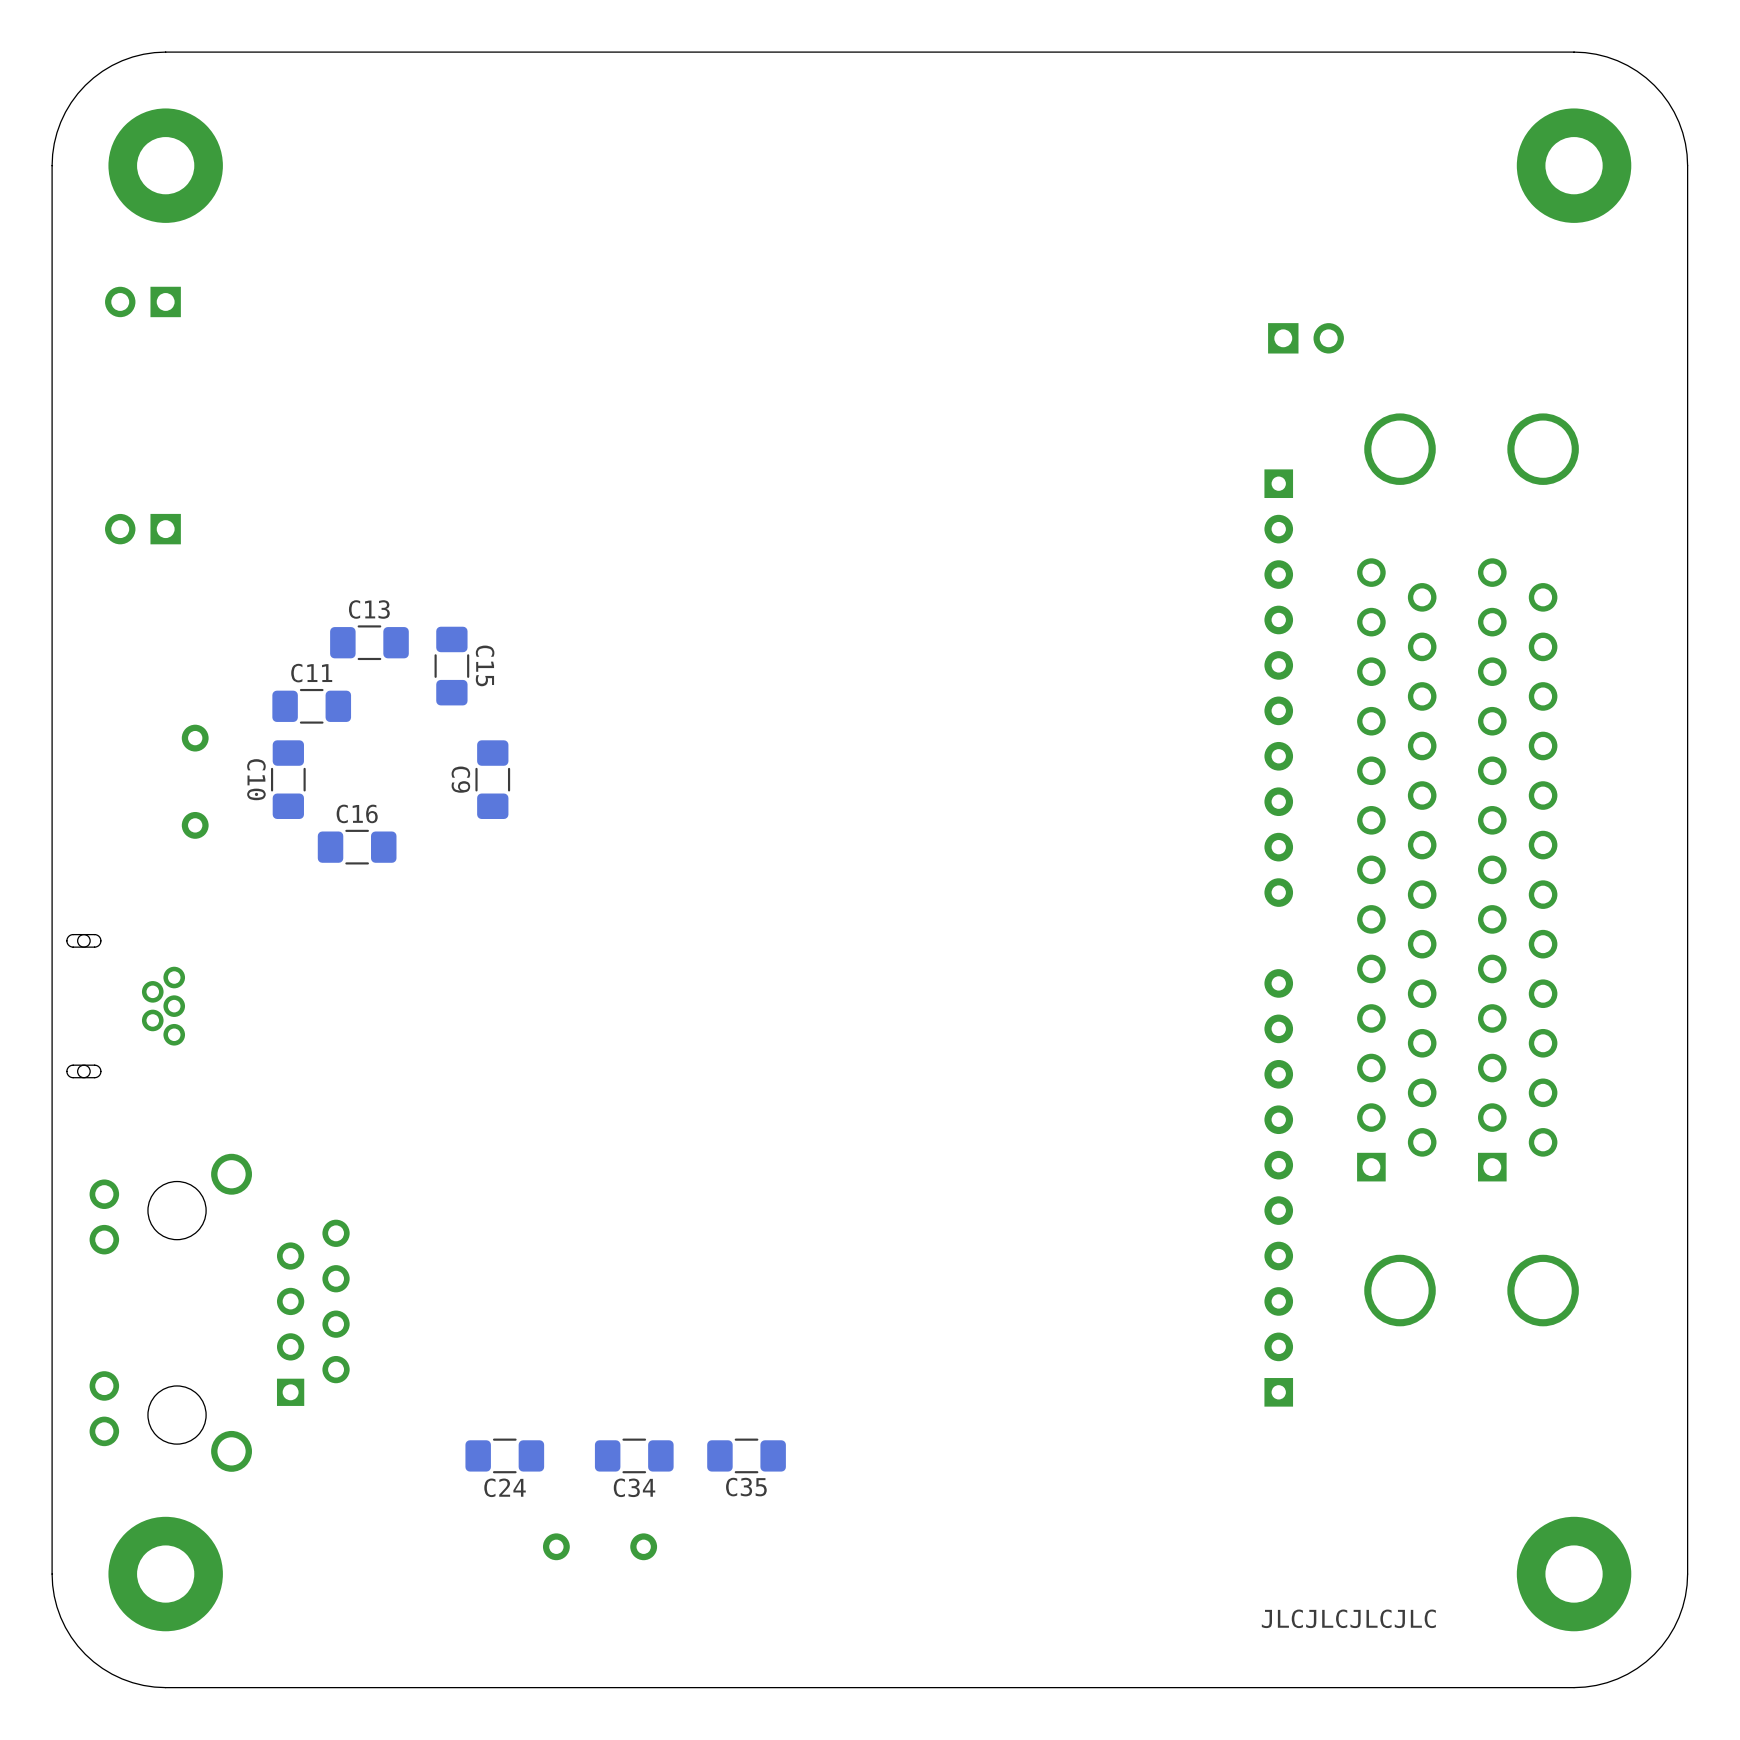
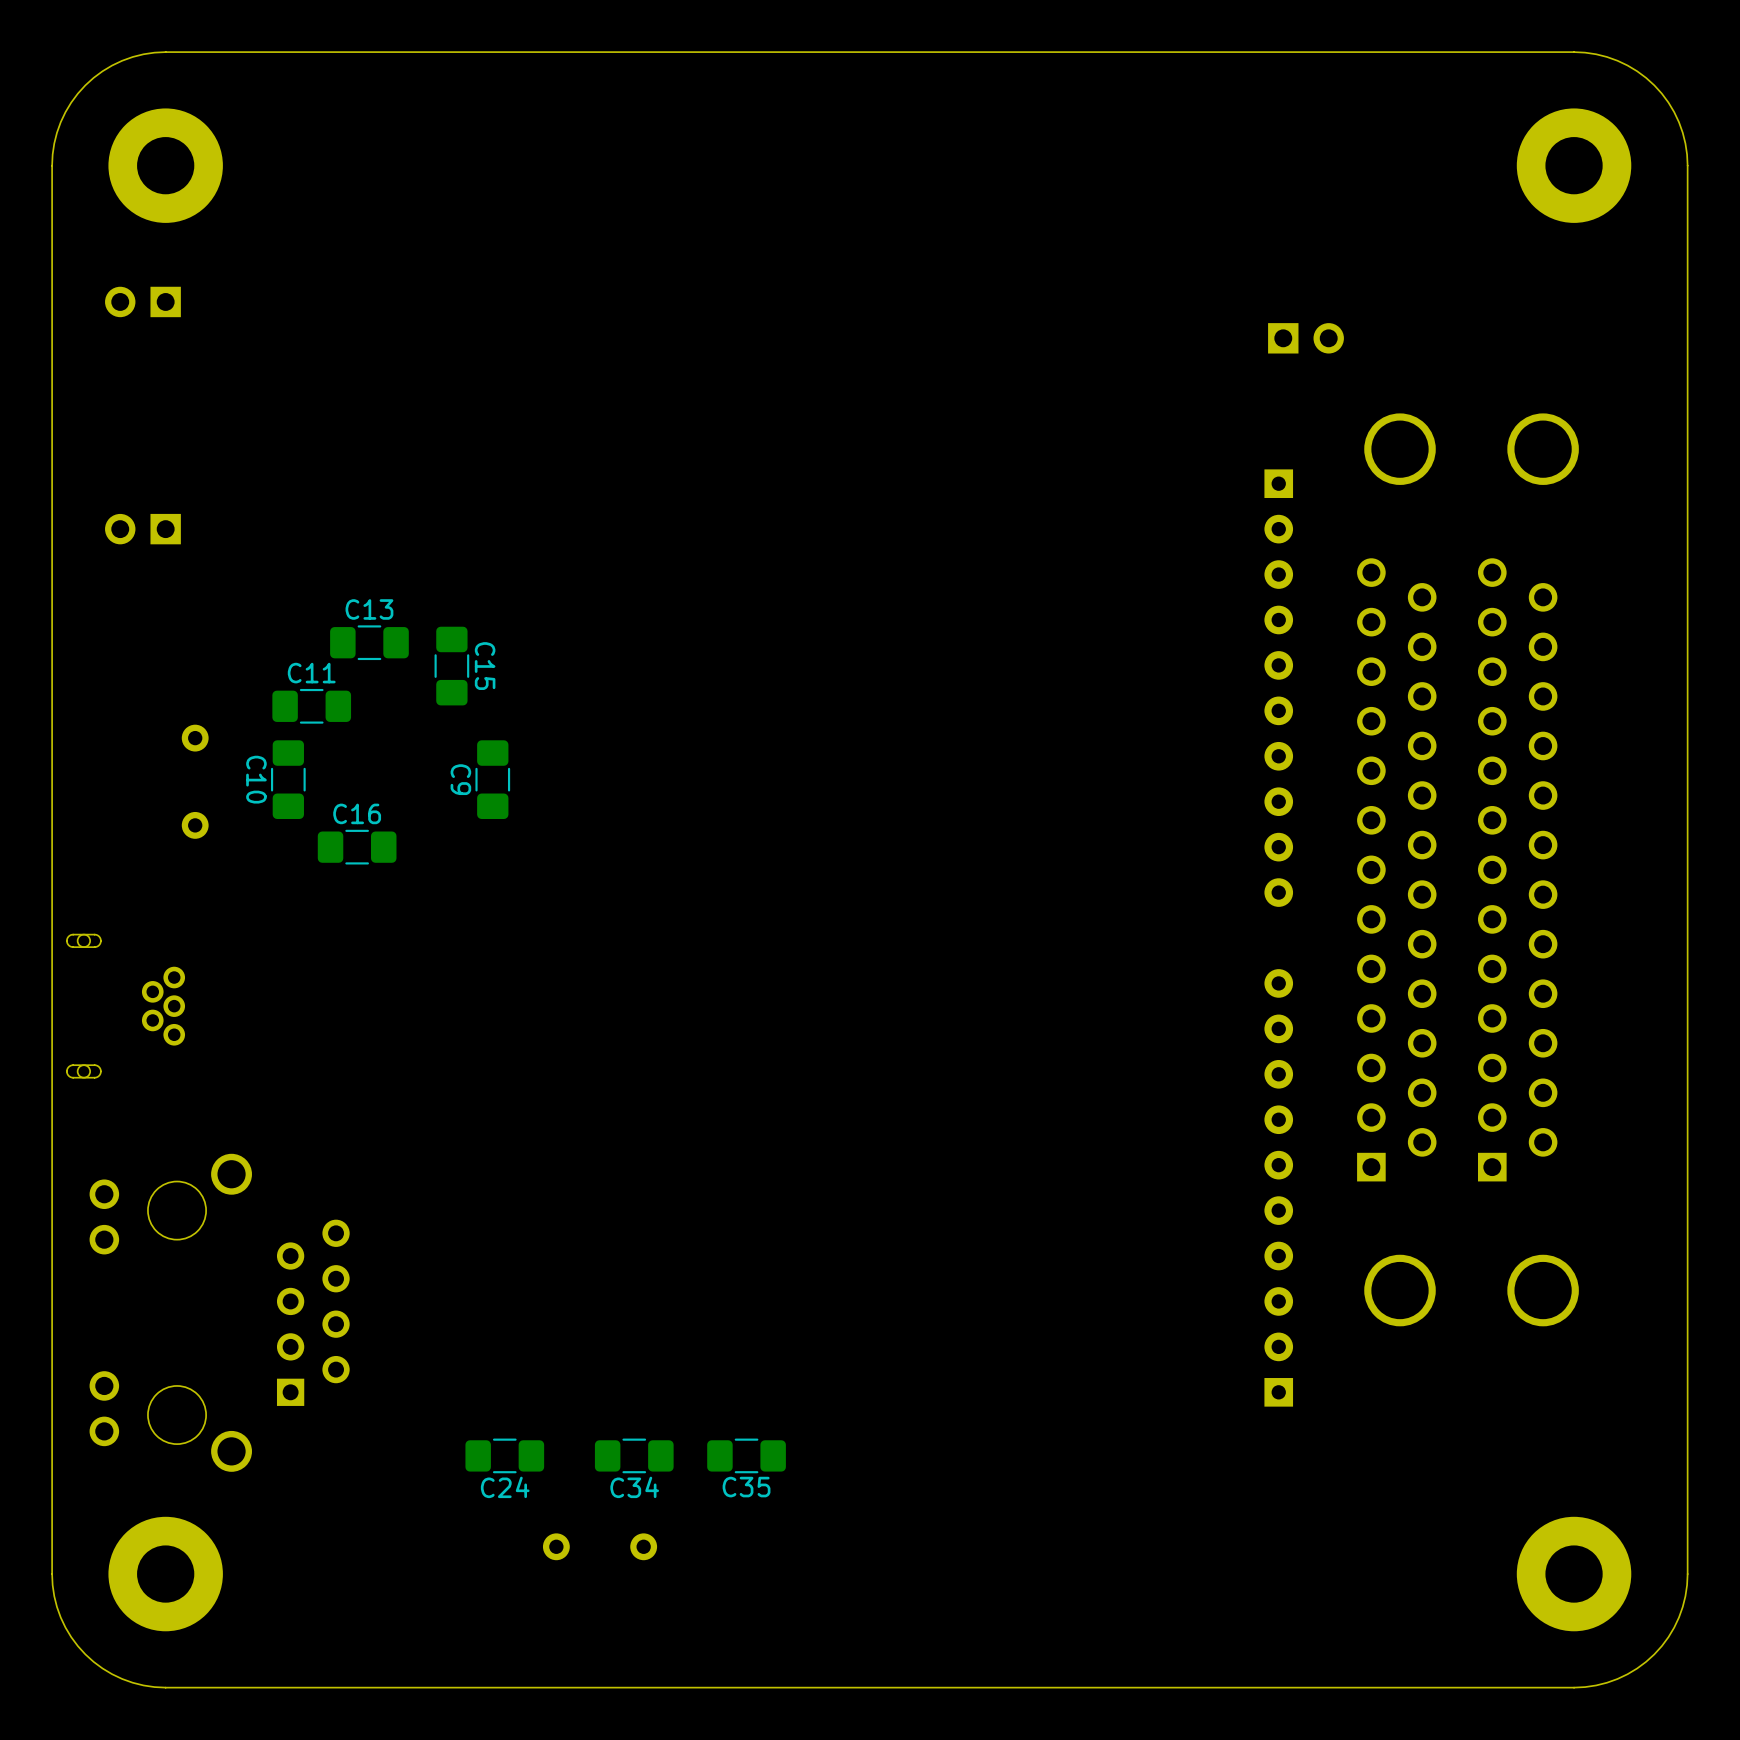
text: JLCJLCJLCJLC (1348, 1618) -> none

